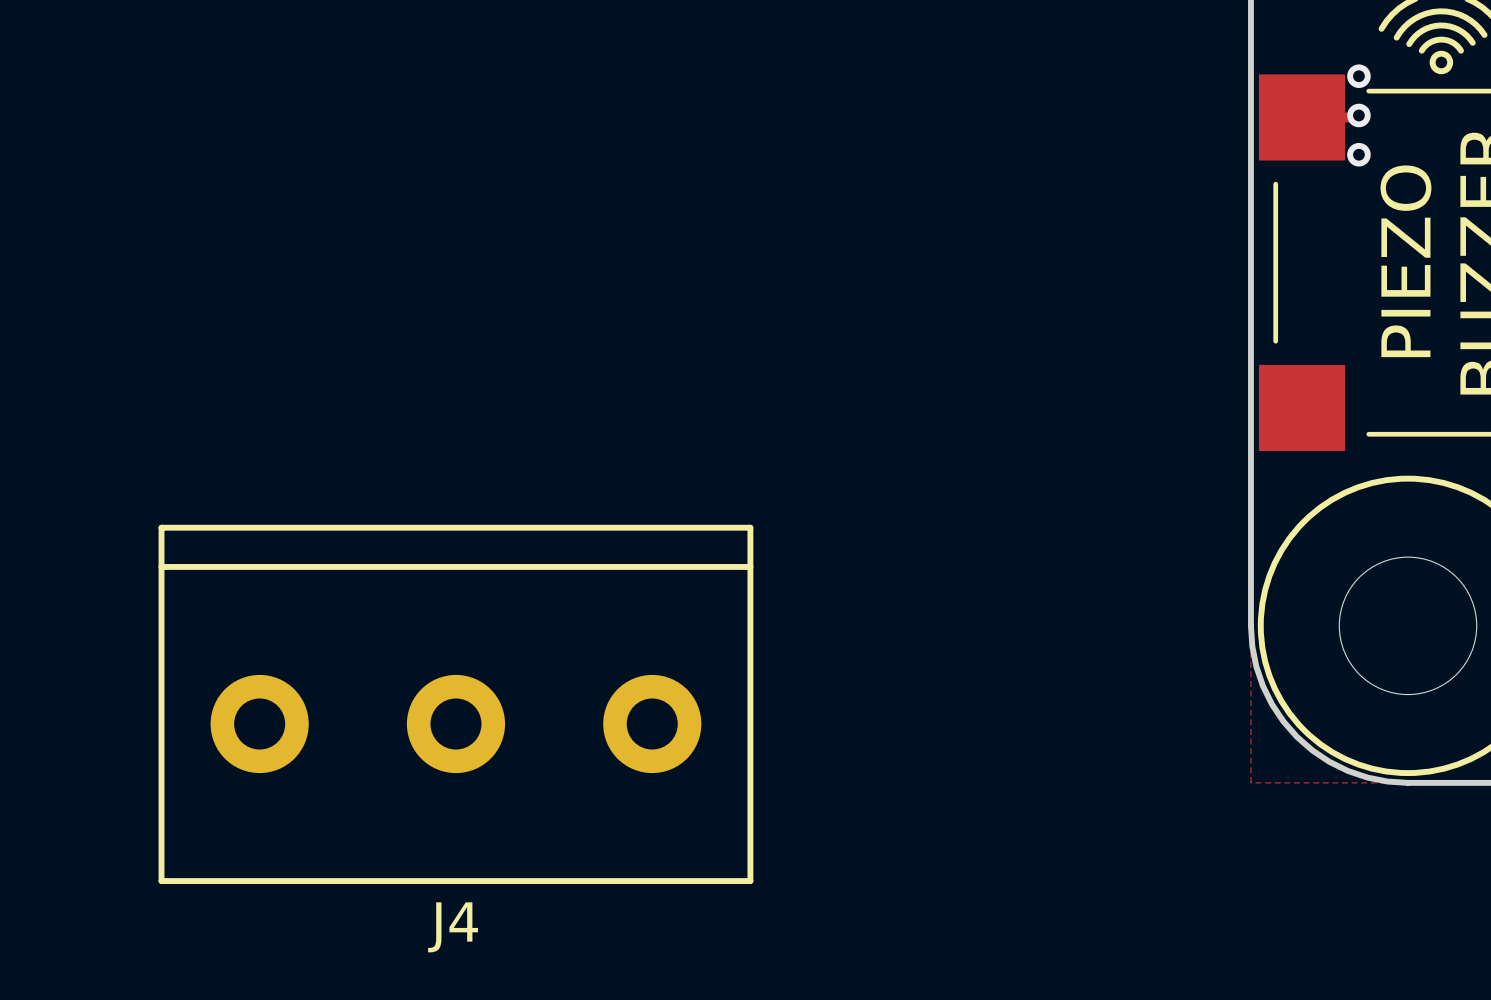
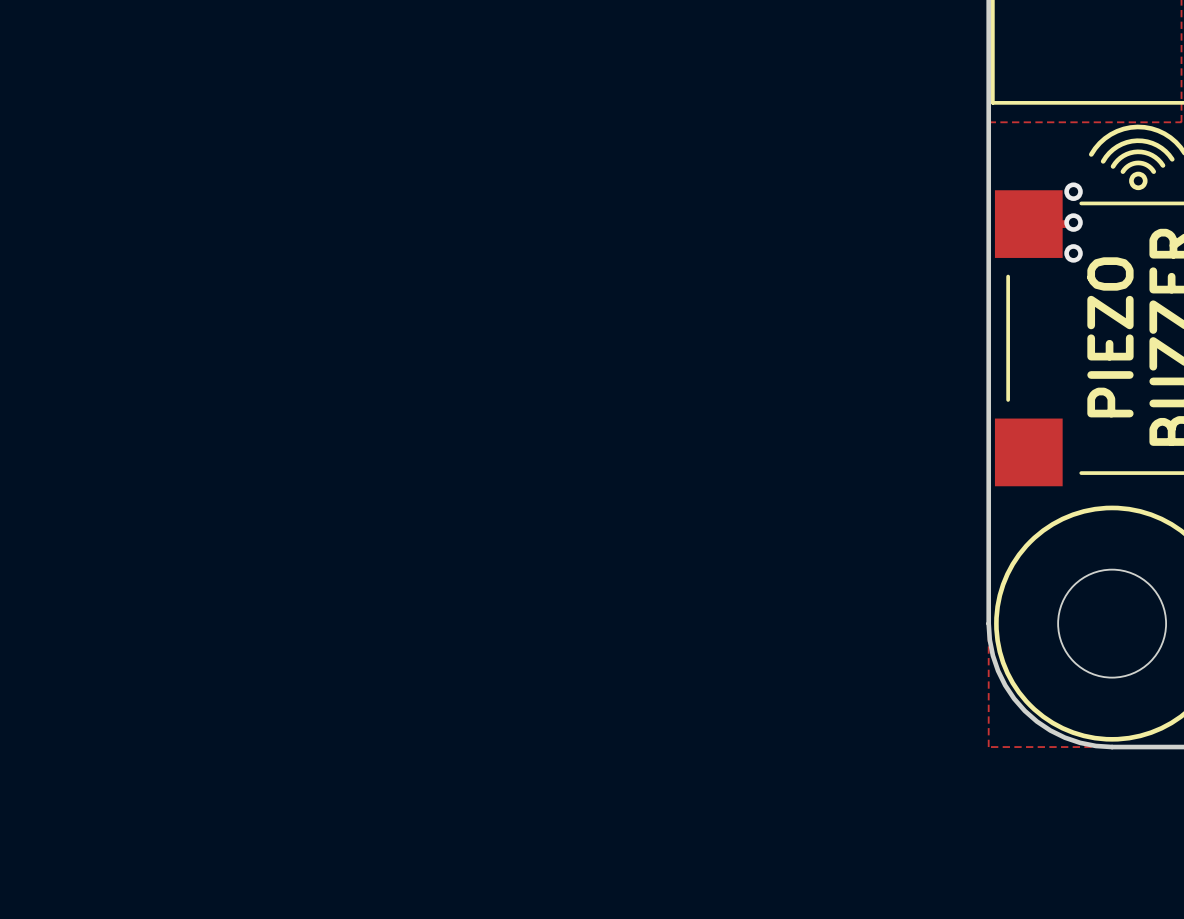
J4: (455, 704) -> none

